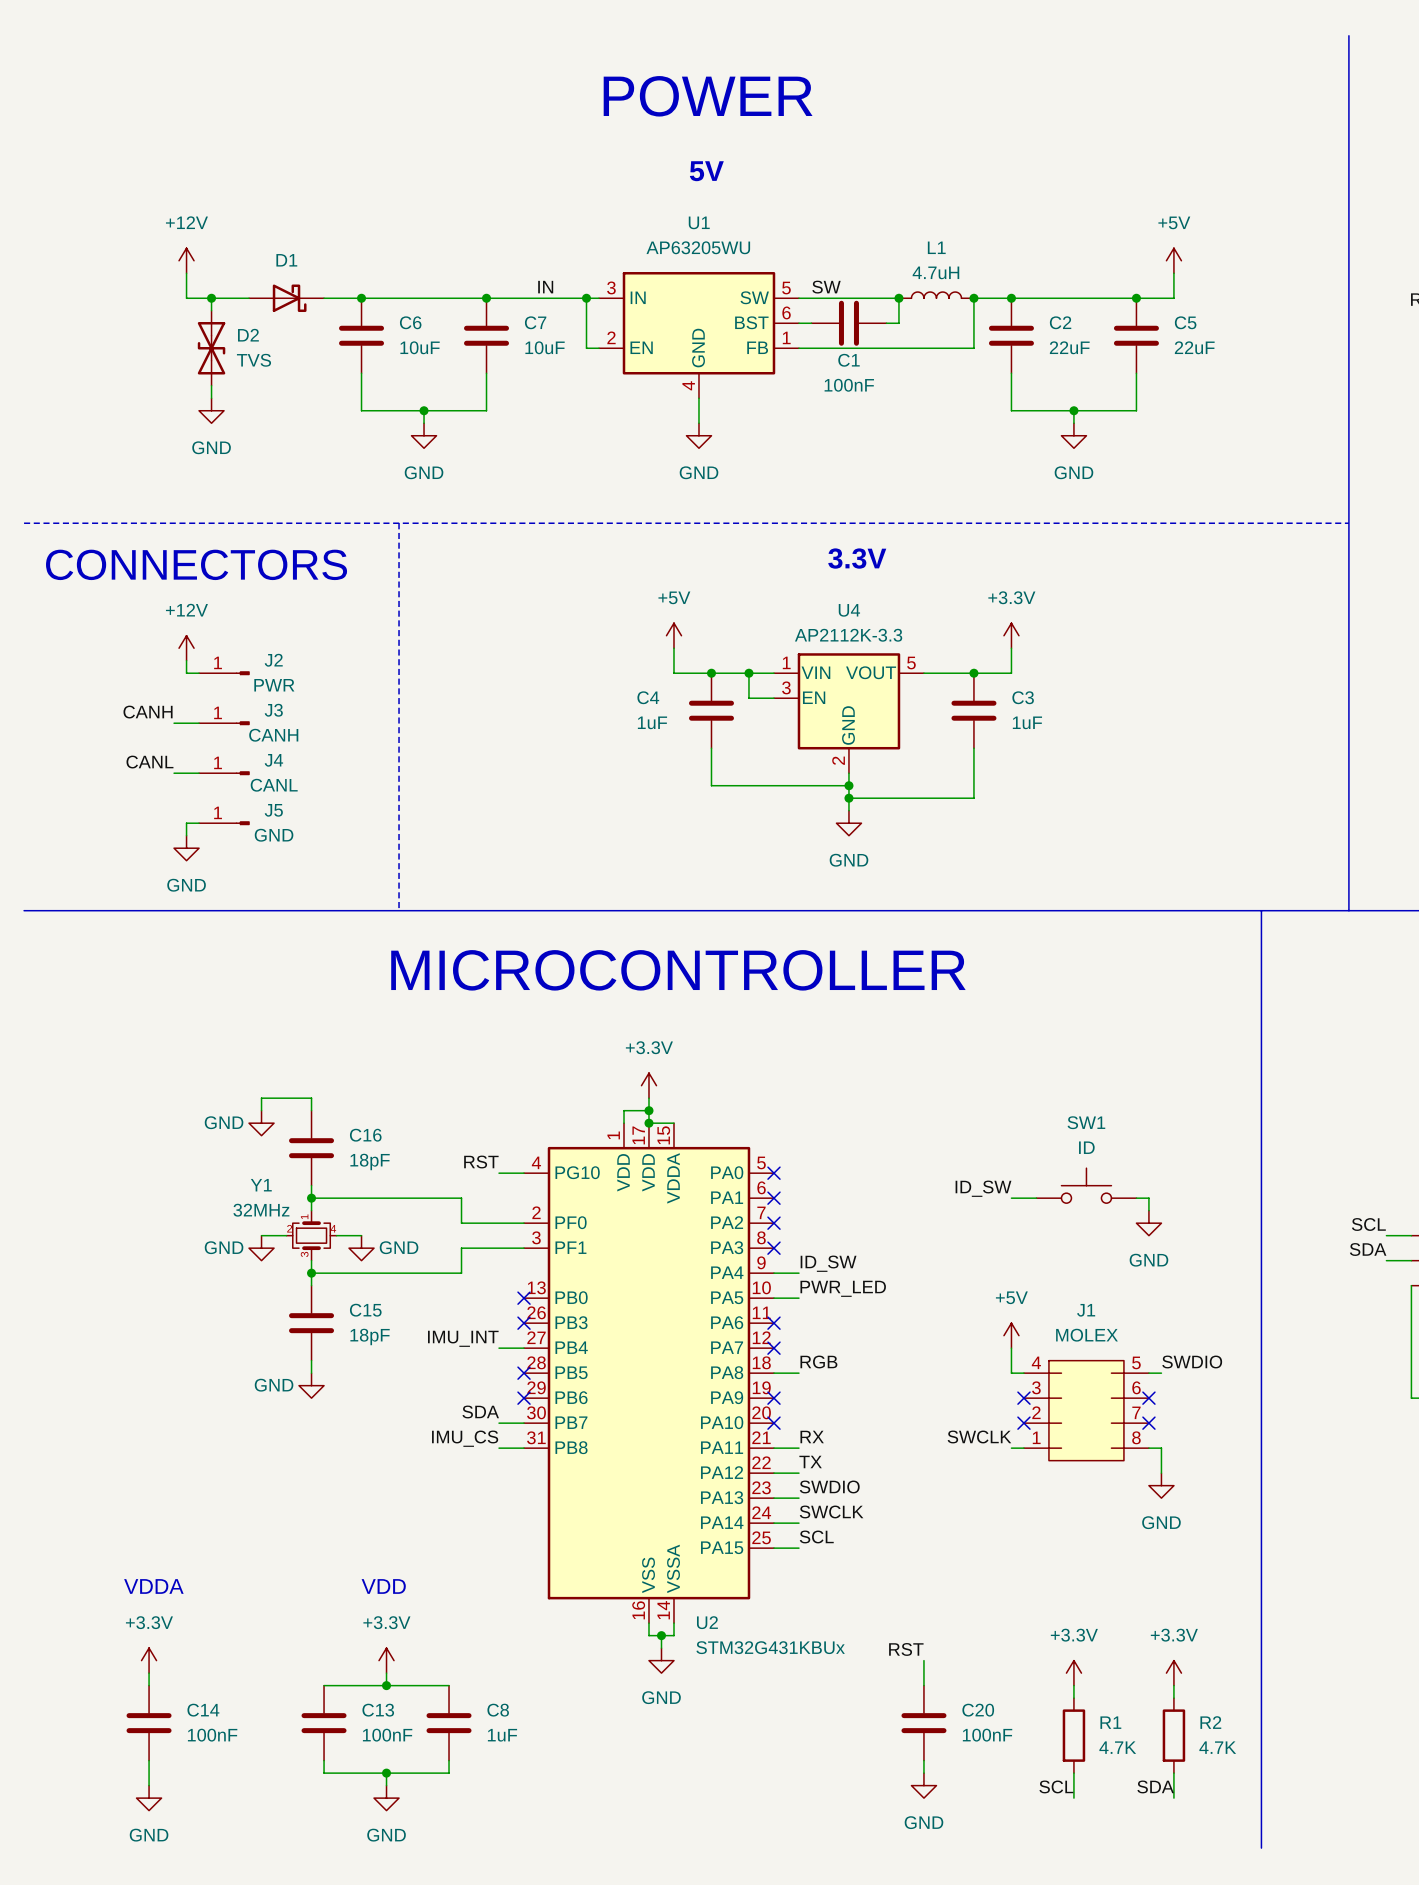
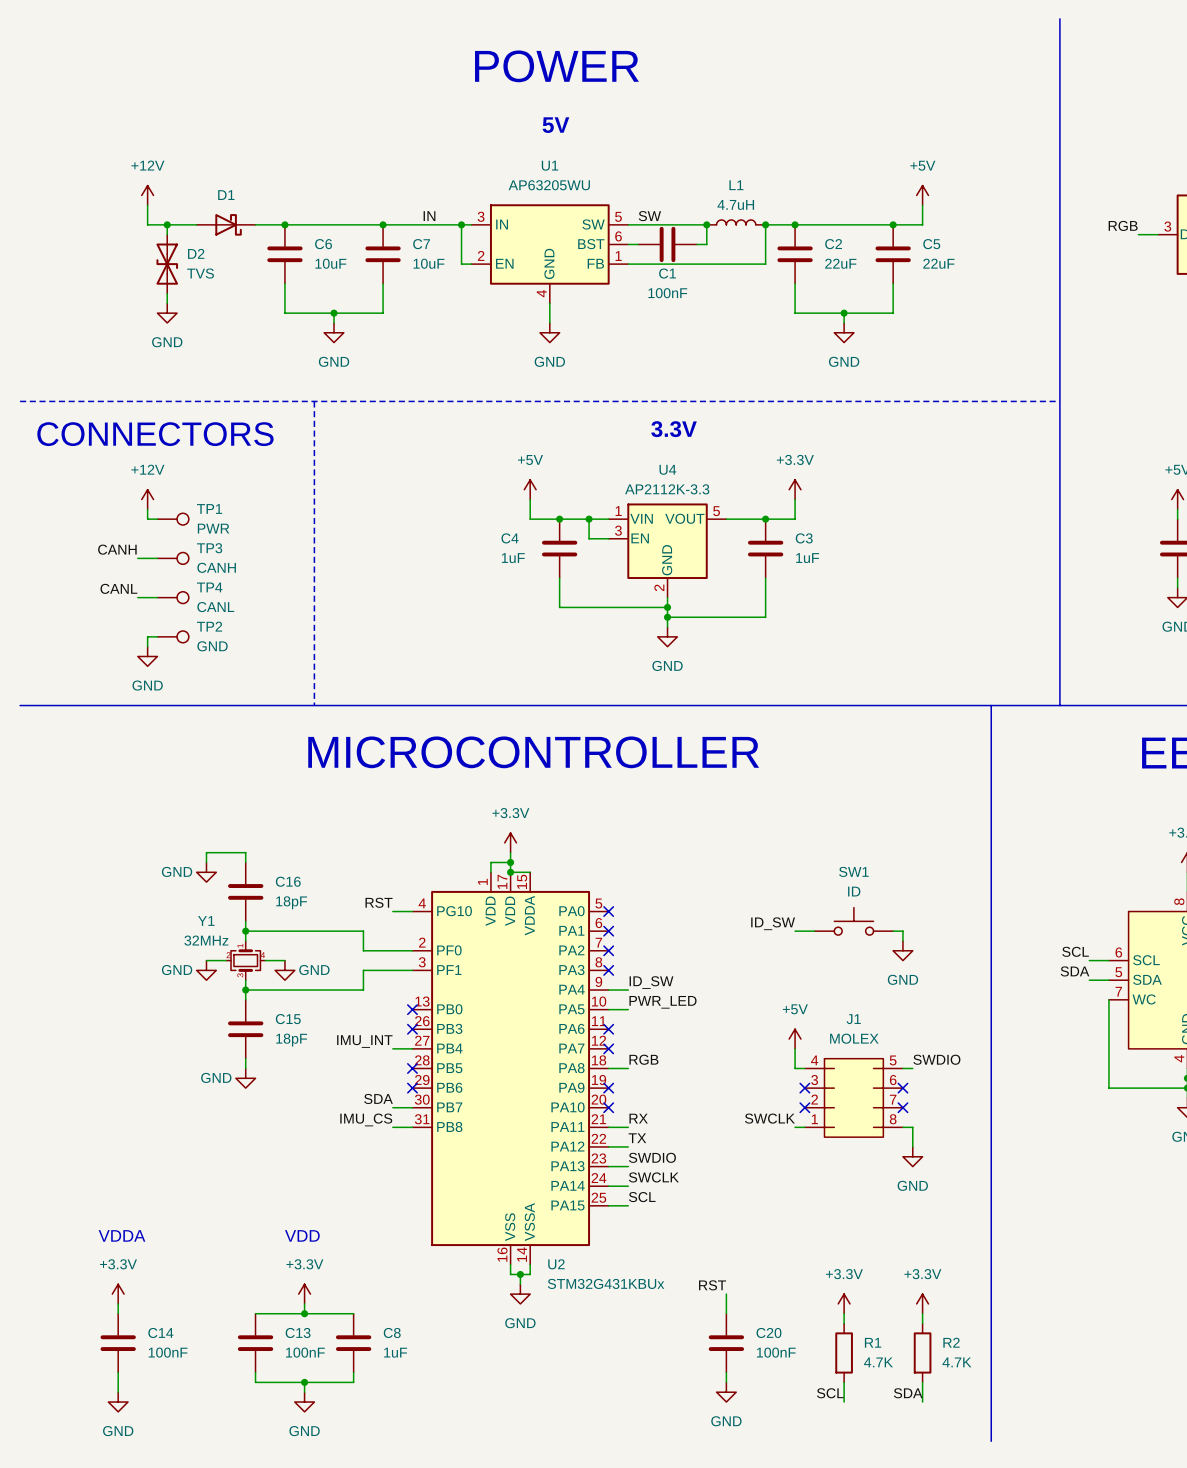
TP1: none -> PWR (173, 519)
J2: PWR (224, 673) -> none
TP3: none -> CANH (173, 558)
J3: CANH (224, 723) -> none
TP4: none -> CANL (173, 597)
J4: CANL (224, 773) -> none
TP2: none -> GND (173, 636)
J5: GND (224, 823) -> none

